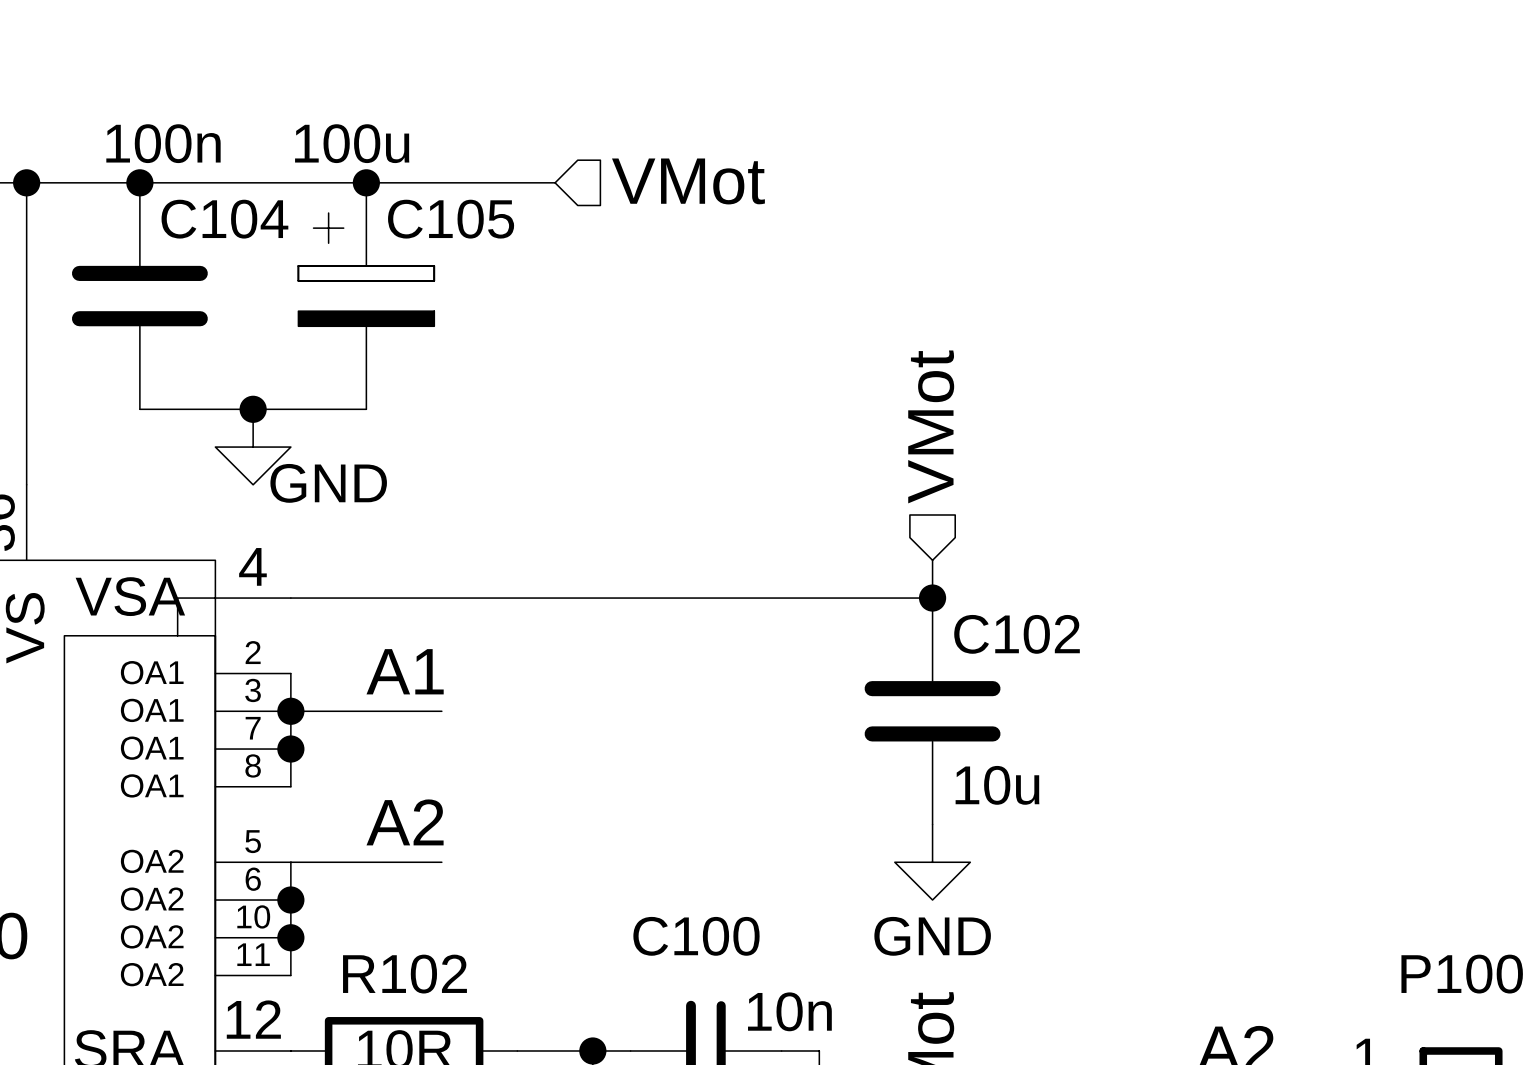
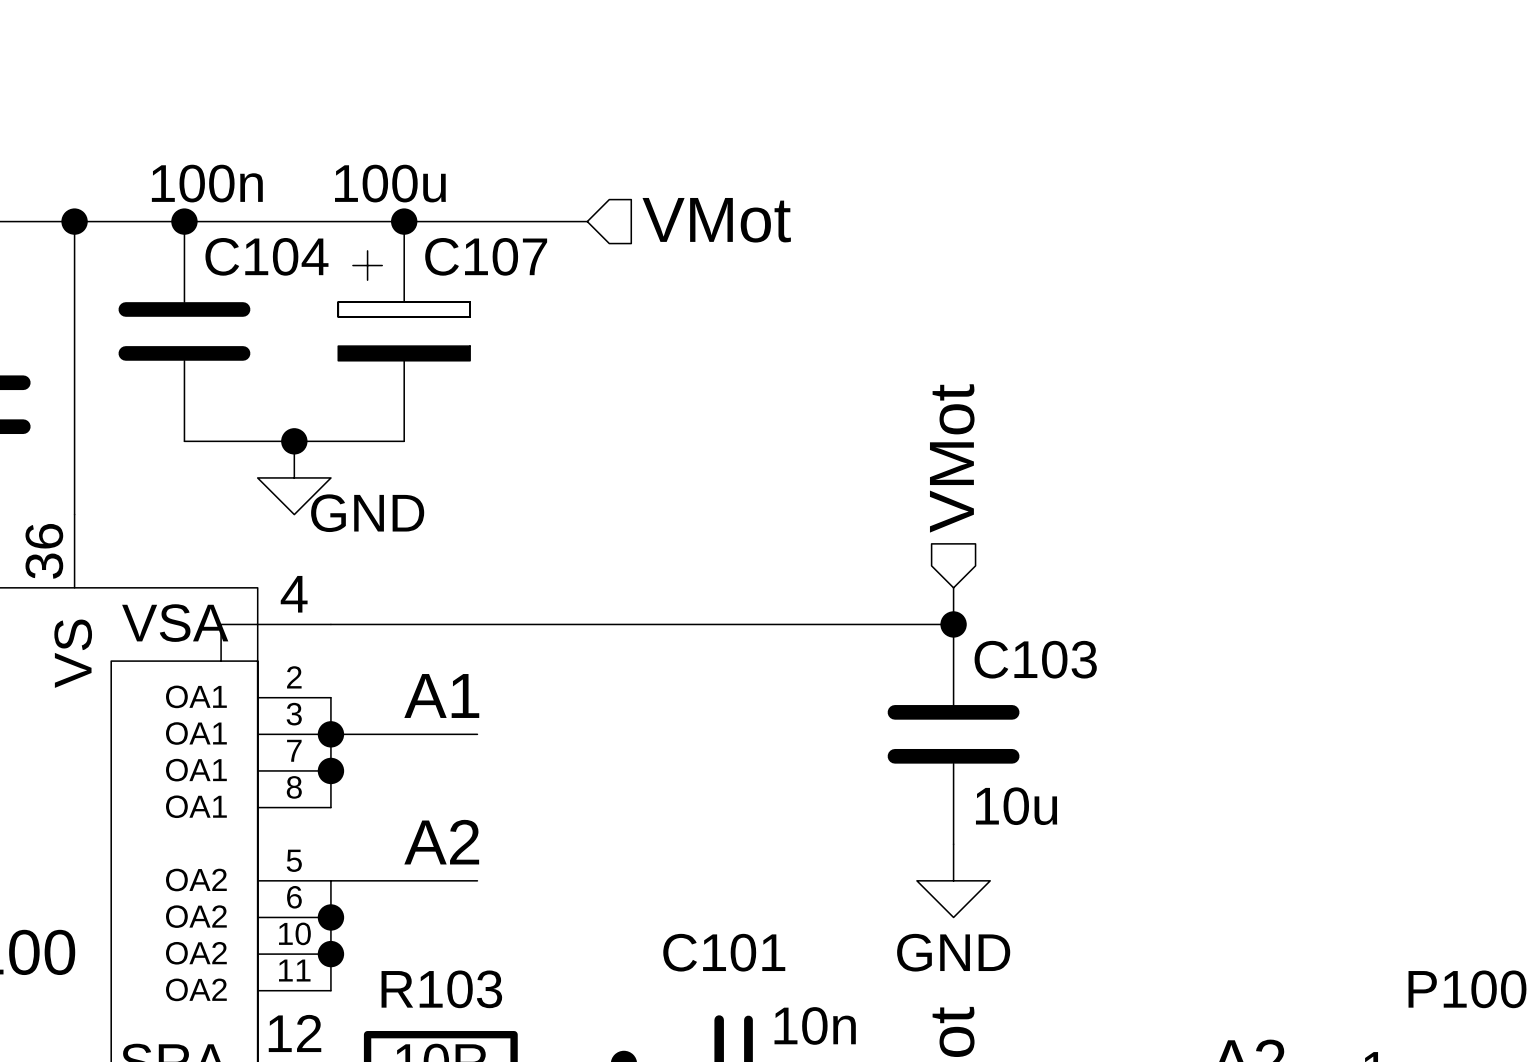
C105 name: C105 (451, 219) -> C107 (486, 256)
C102 name: C102 (1017, 634) -> C103 (1035, 659)
C100 name: C100 (696, 936) -> C101 (724, 952)
R102 name: R102 (404, 974) -> R103 (441, 989)

